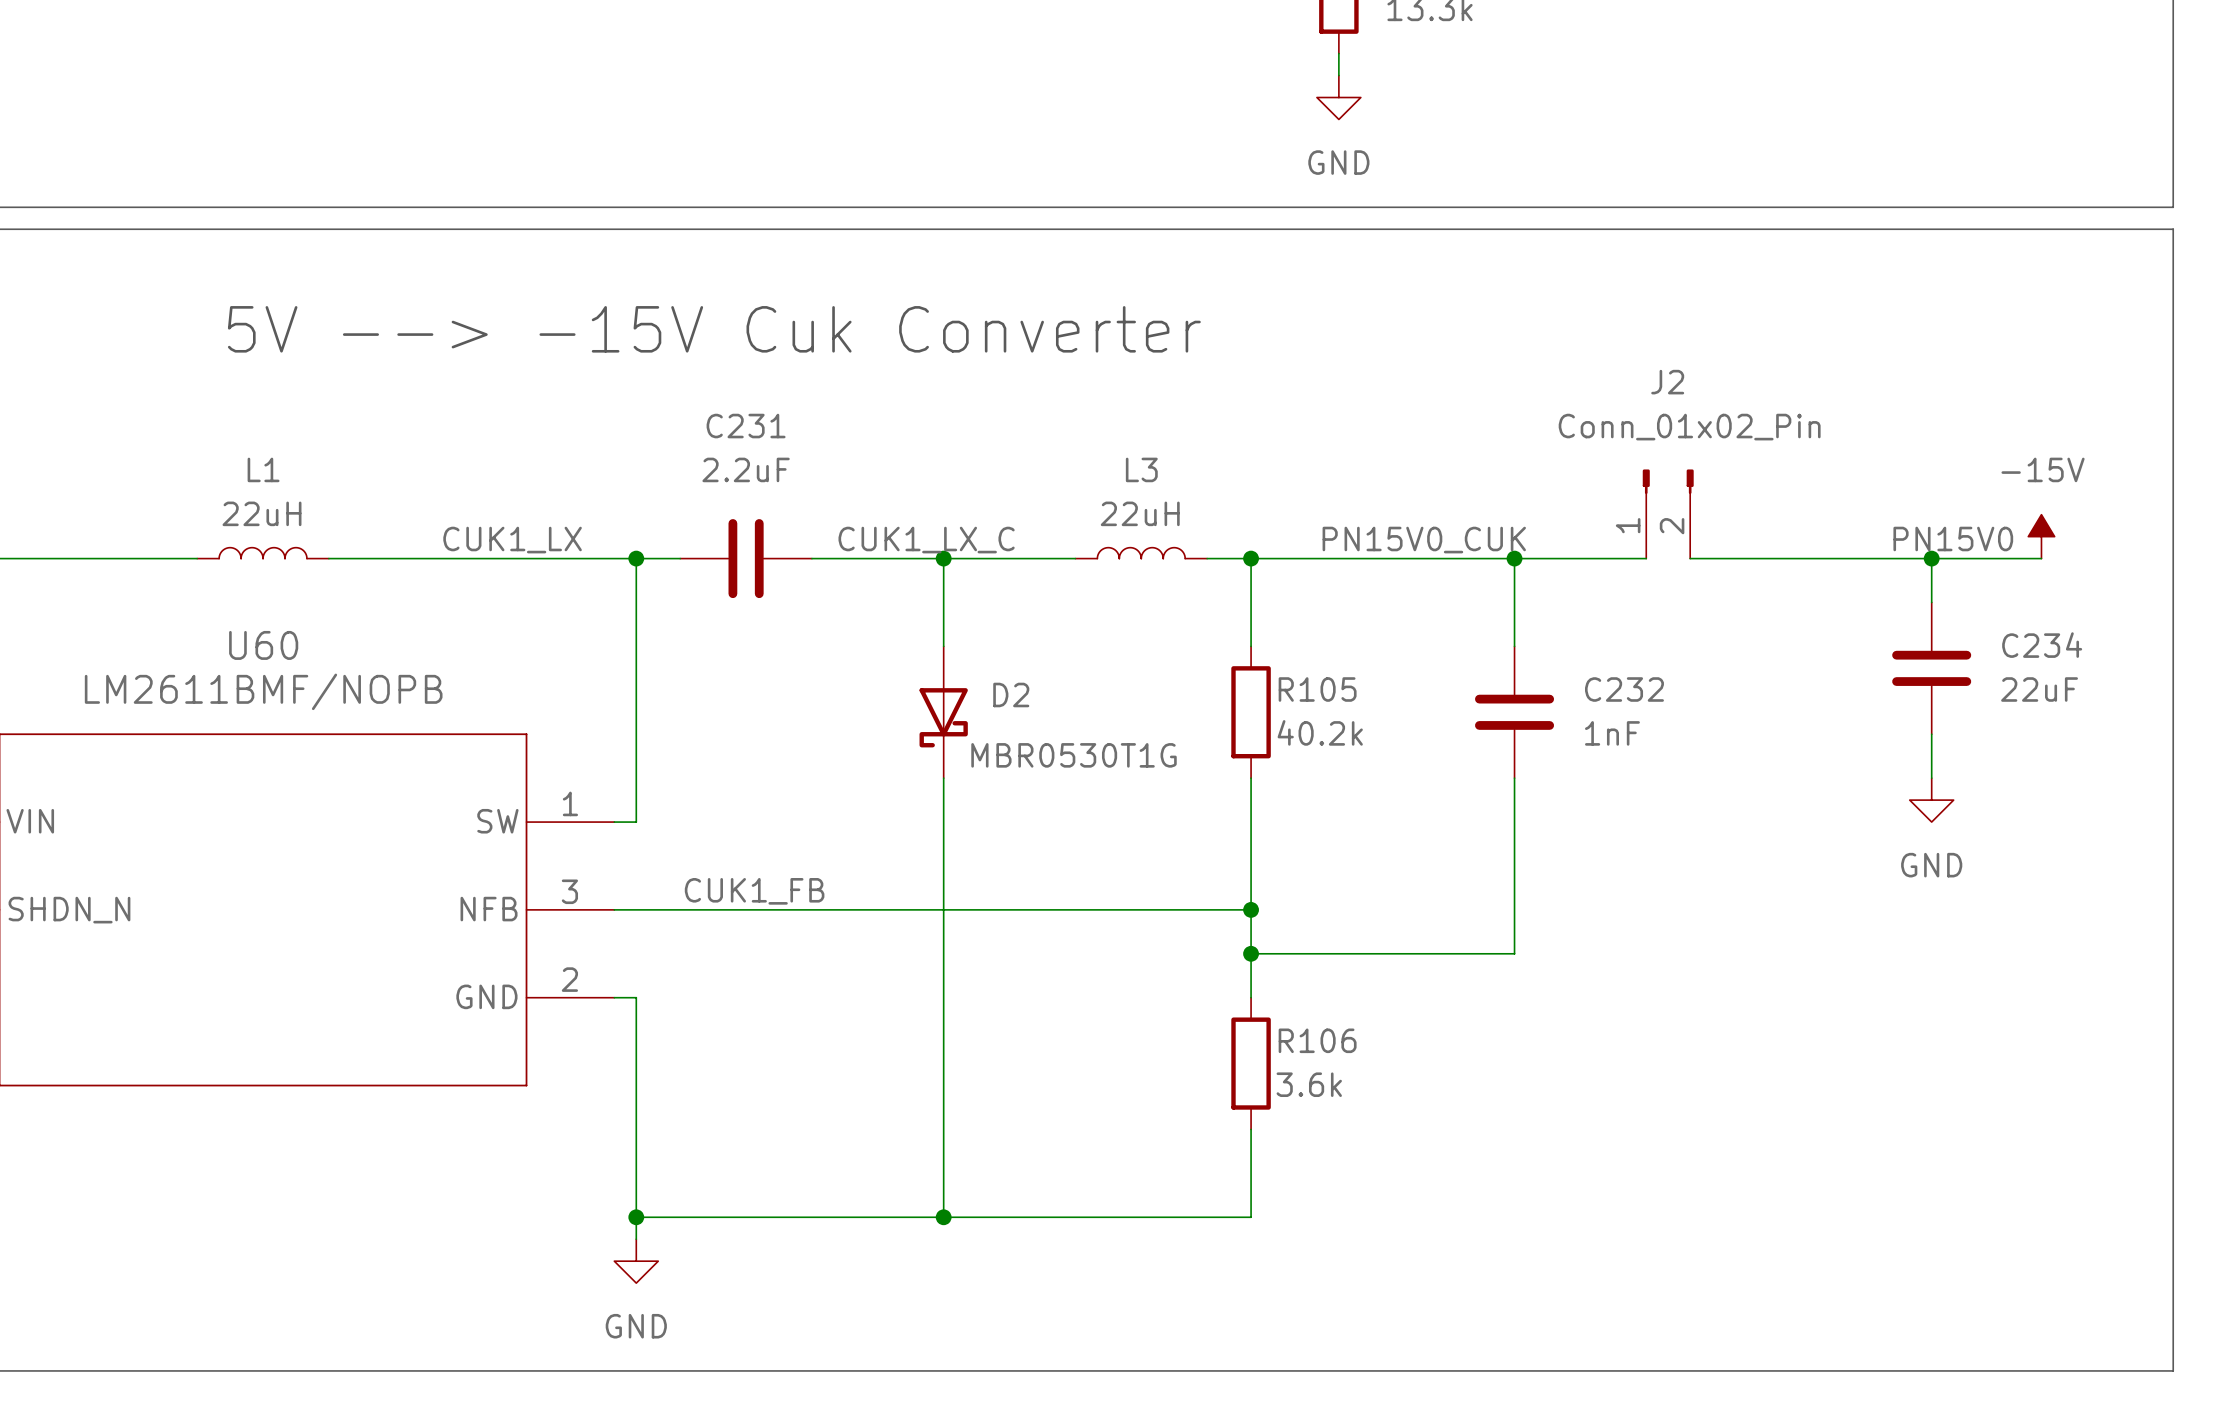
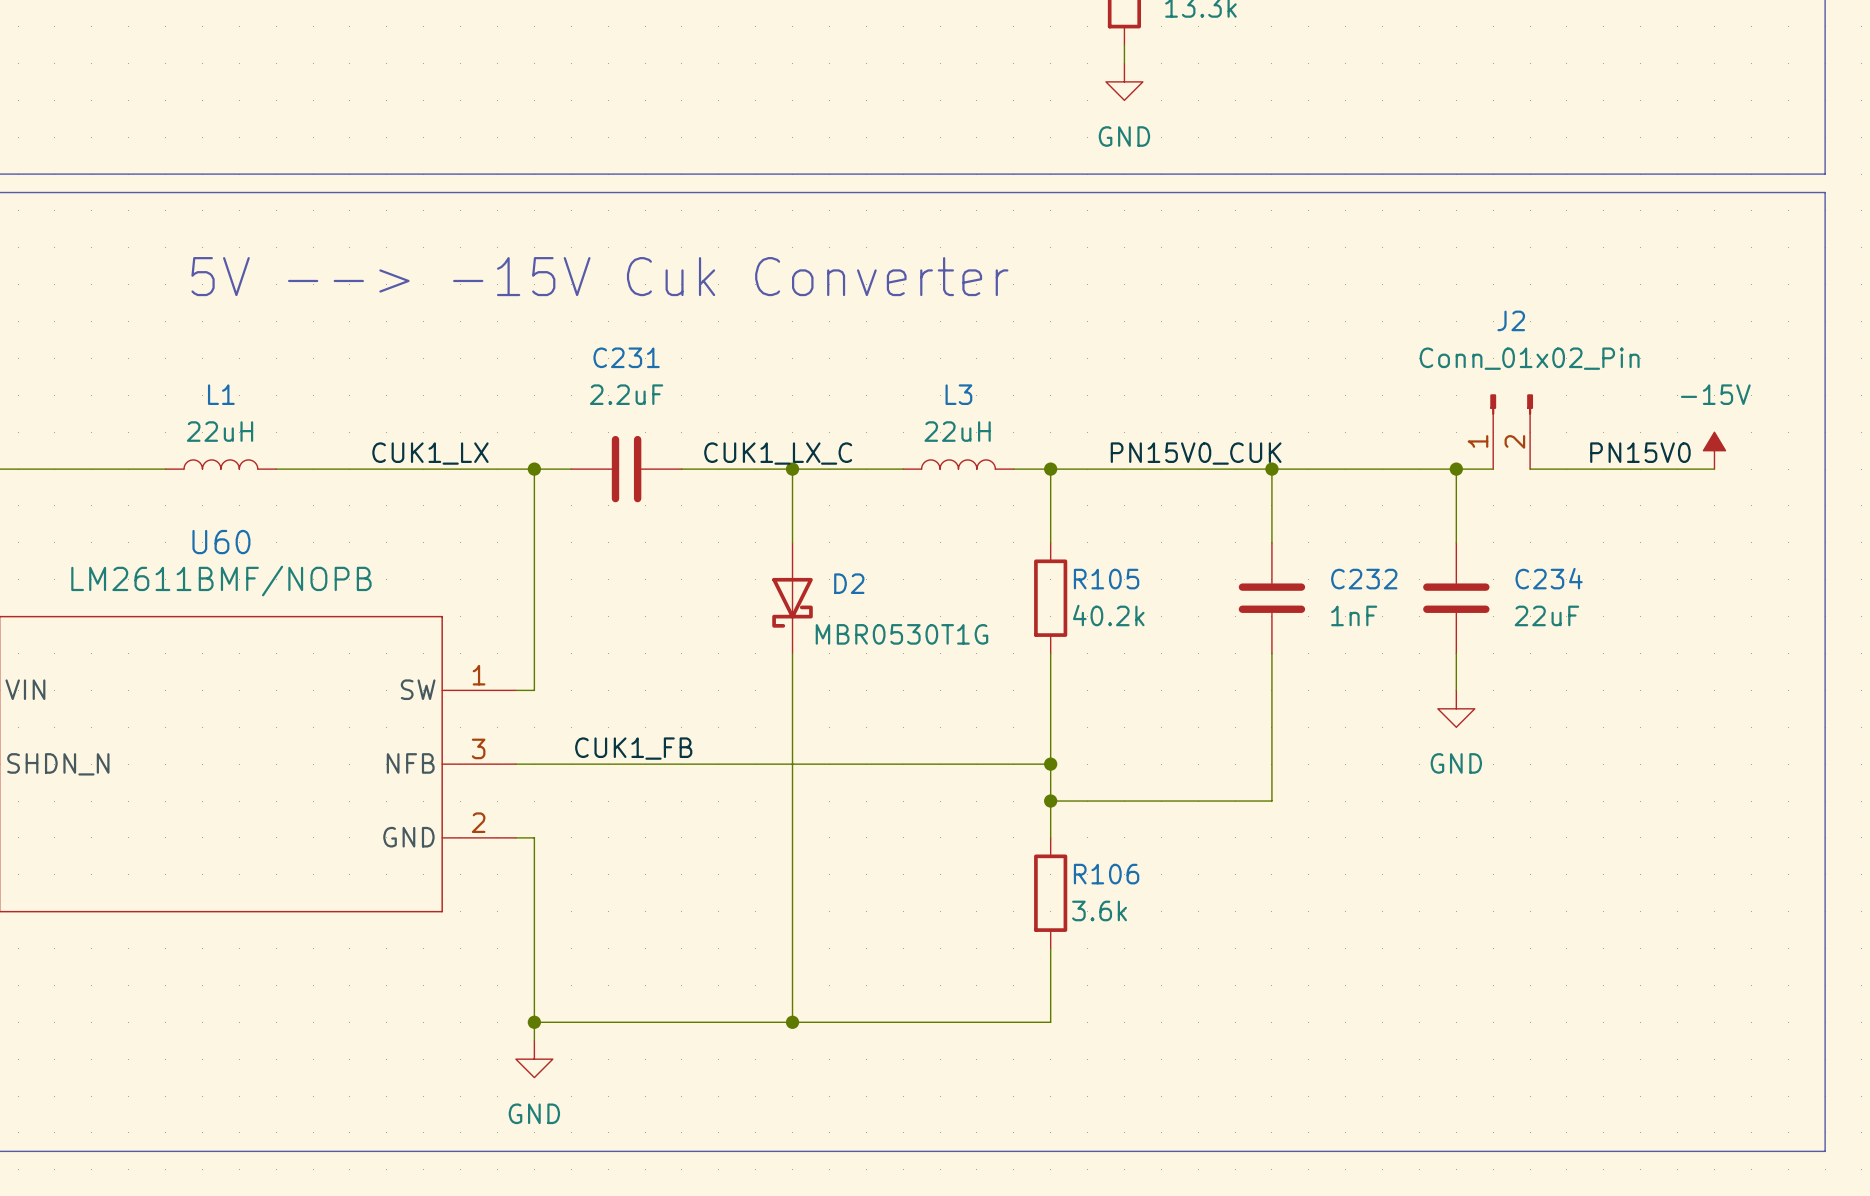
J2 position: (1668, 514) -> (1511, 431)
wire: none -> (1456, 469) (1456, 542)
junction: none -> (1456, 469)
wire: (1778, 558) (1821, 558) -> (1382, 469) (1419, 469)
wire: (1931, 558) (1931, 602) -> none
junction: (1931, 558) -> none
C234 position: (1931, 668) -> (1456, 598)
wire: (1931, 734) (1931, 778) -> (1456, 653) (1456, 690)
power symbol position: GND (1931, 800) -> GND (1456, 708)

